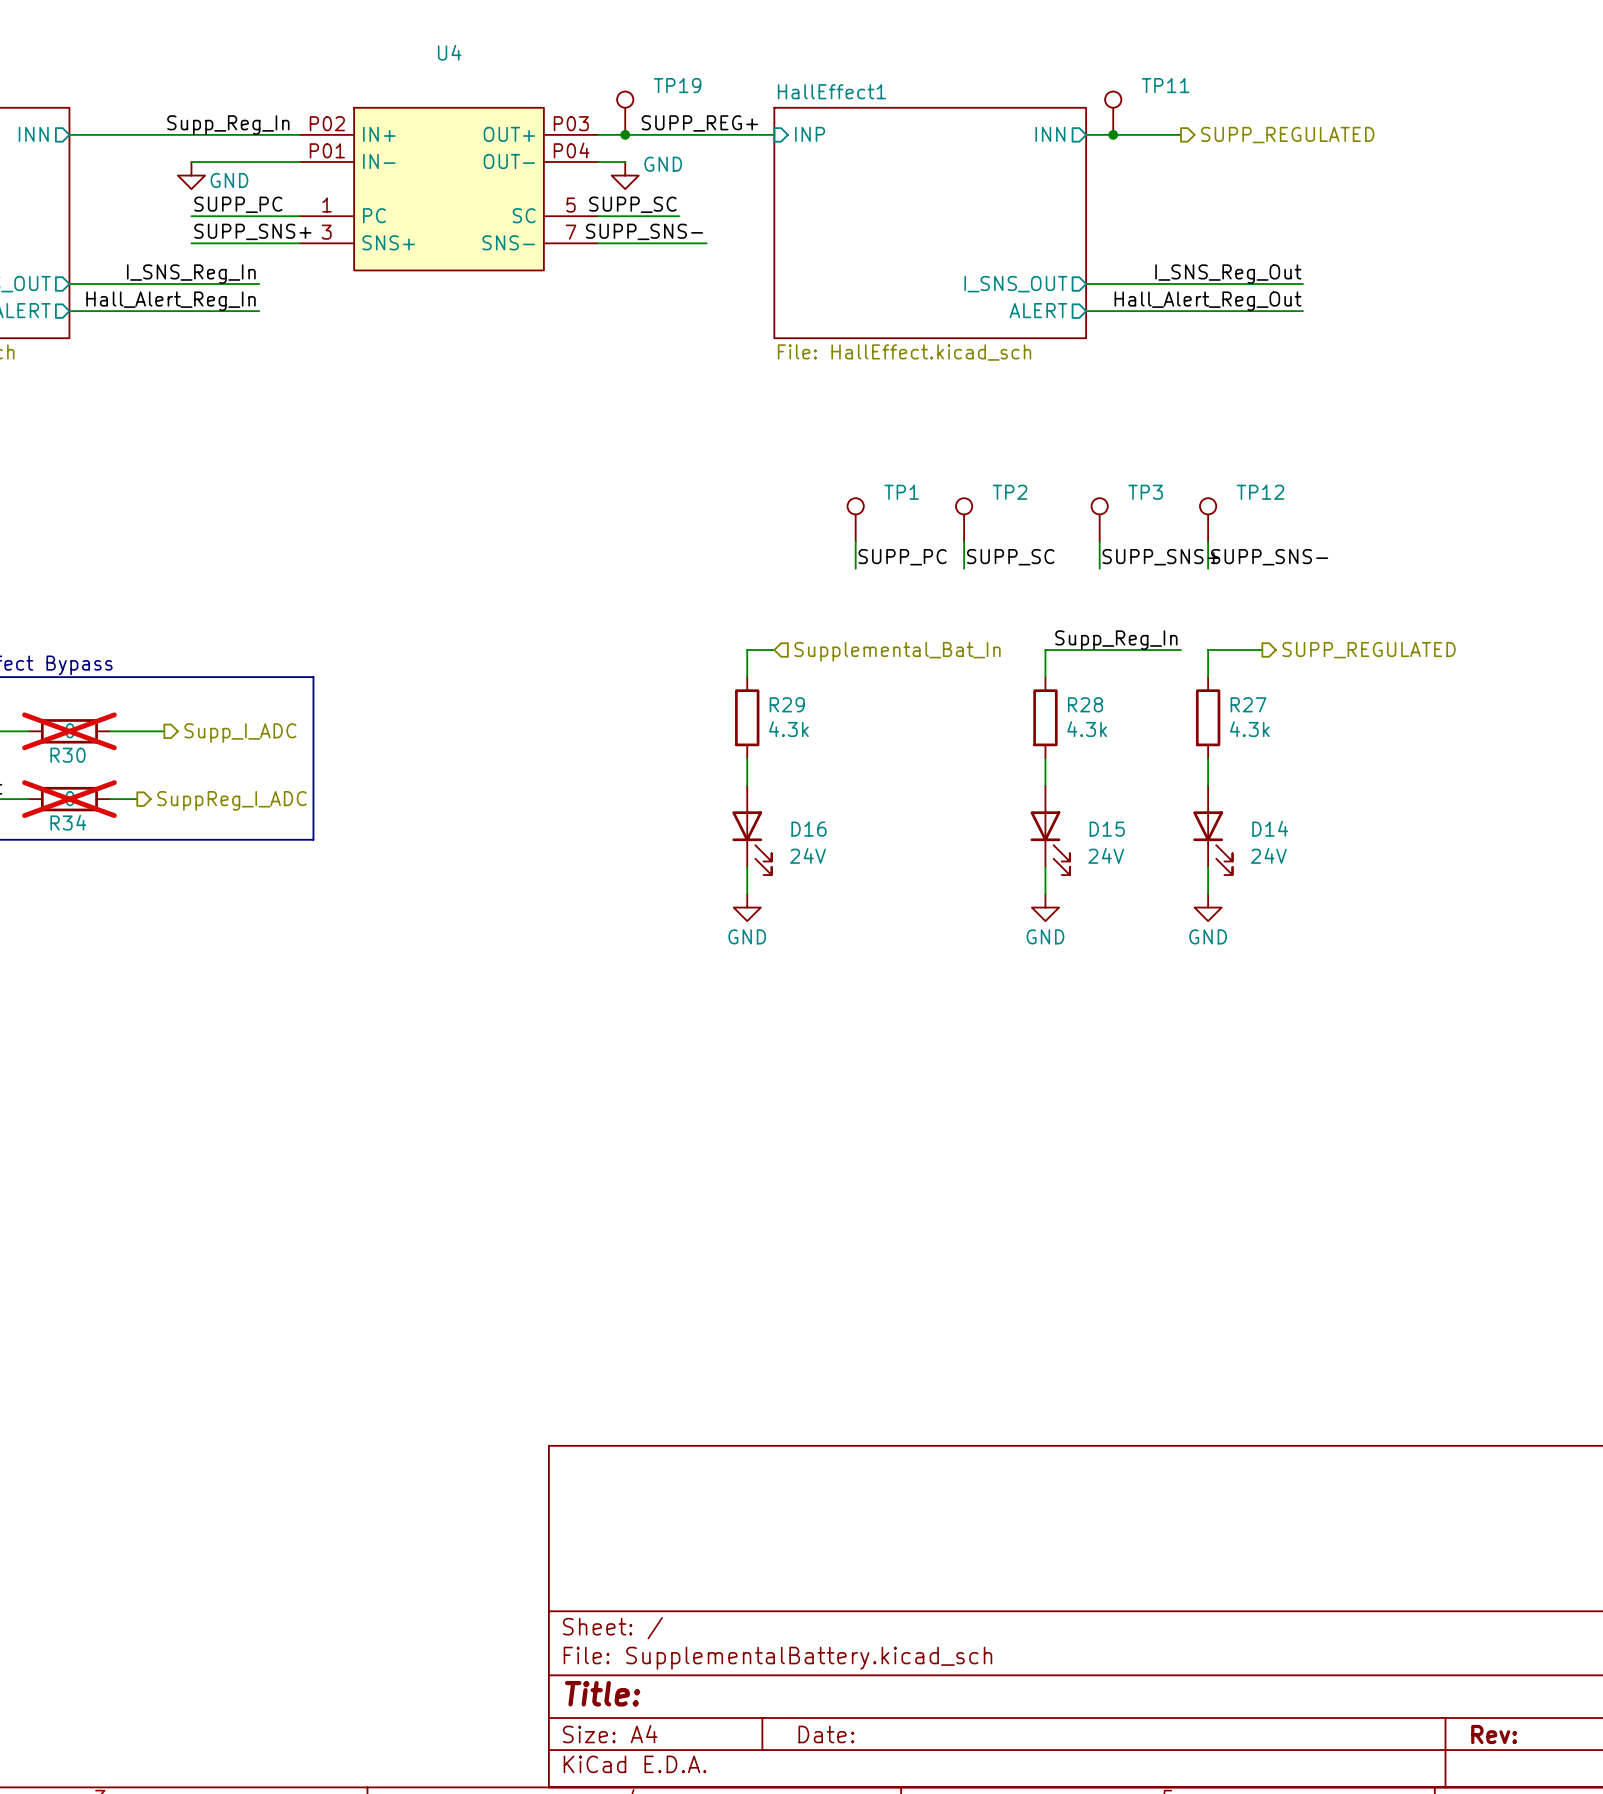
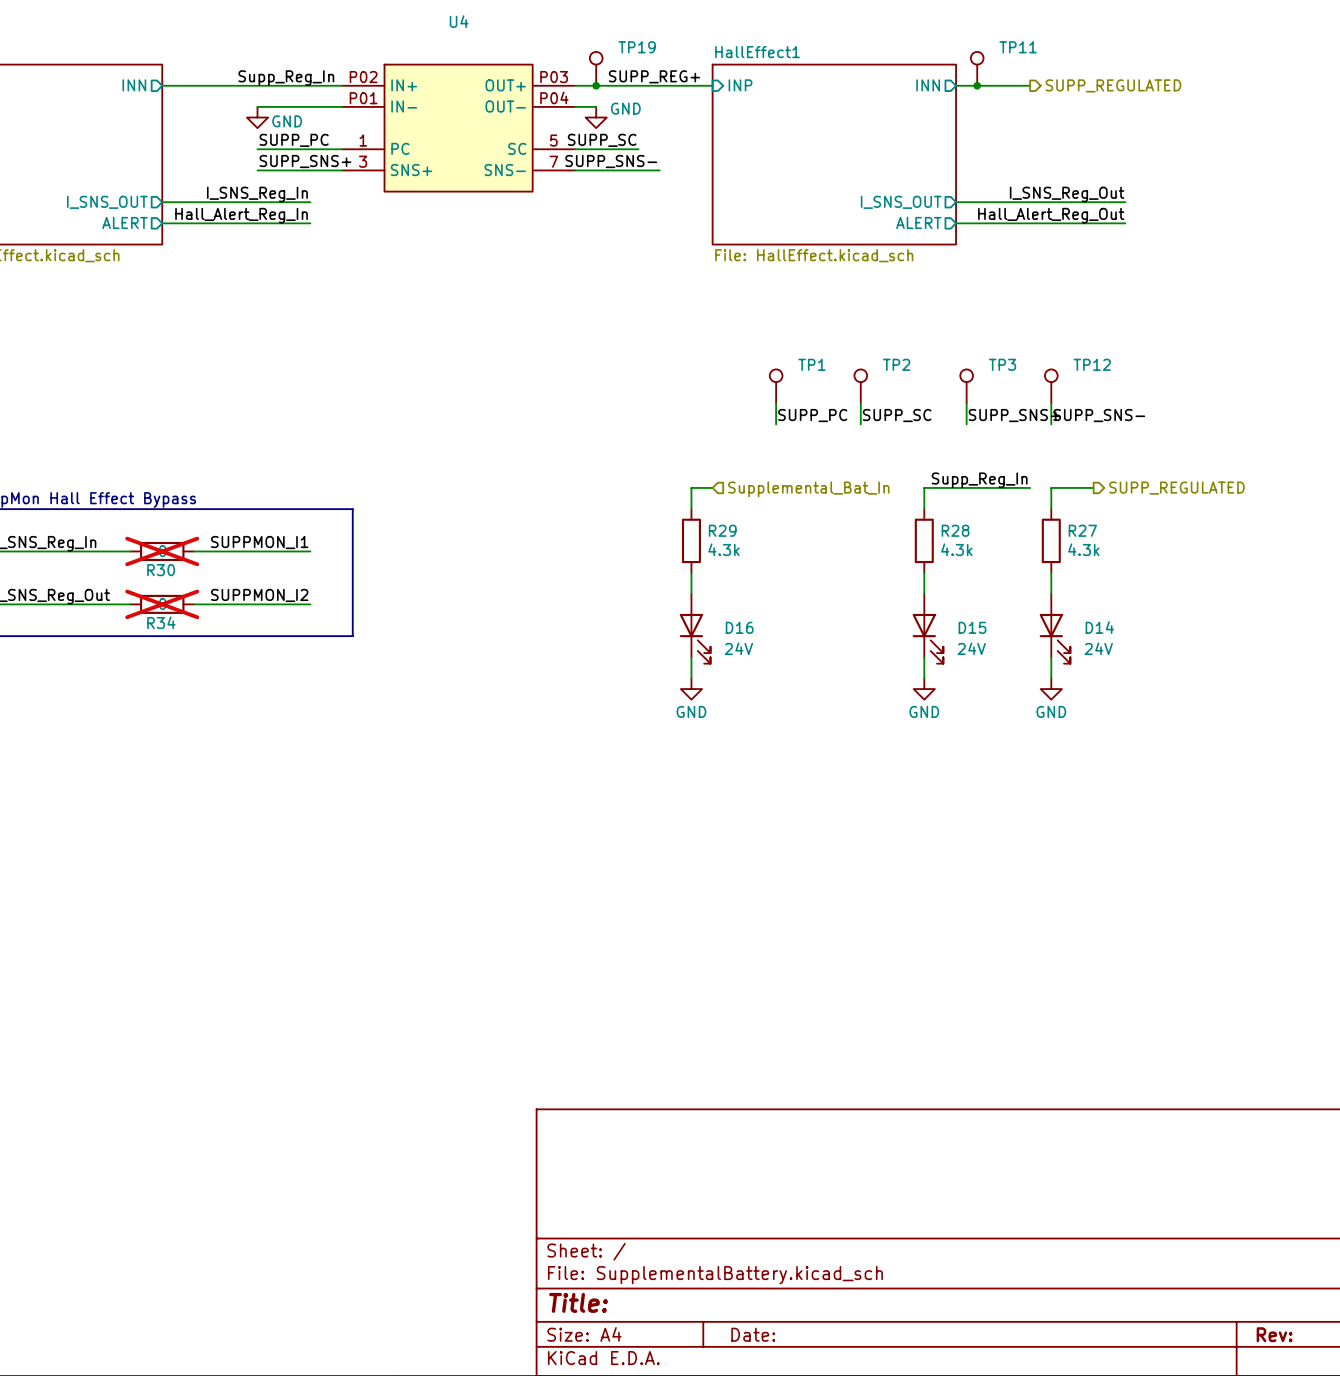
label: none -> SUPPMON_I1 (259, 542)
wire: none -> (236, 551) (310, 551)
hierarchical label: Supp_I_ADC (240, 733) -> none
label: none -> SUPPMON_I2 (259, 595)
wire: none -> (215, 604) (310, 604)
hierarchical label: SuppReg_I_ADC (232, 800) -> none

